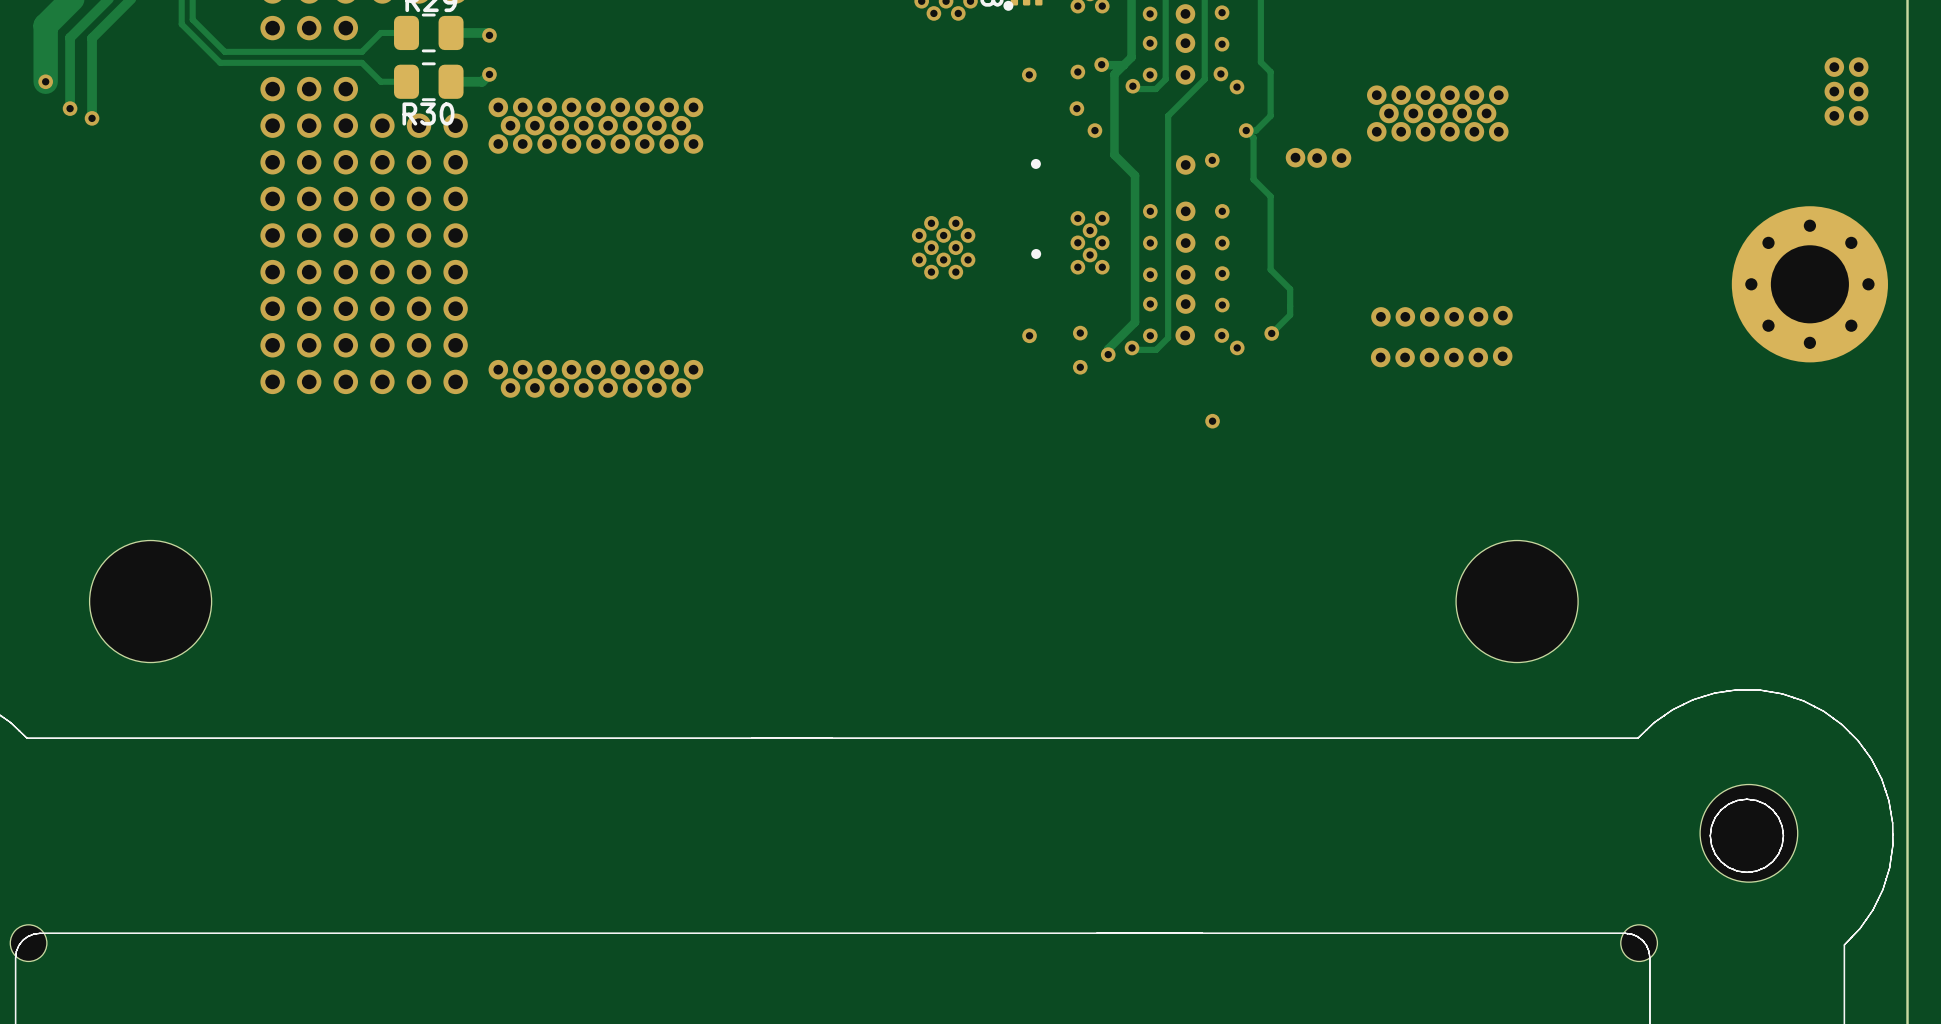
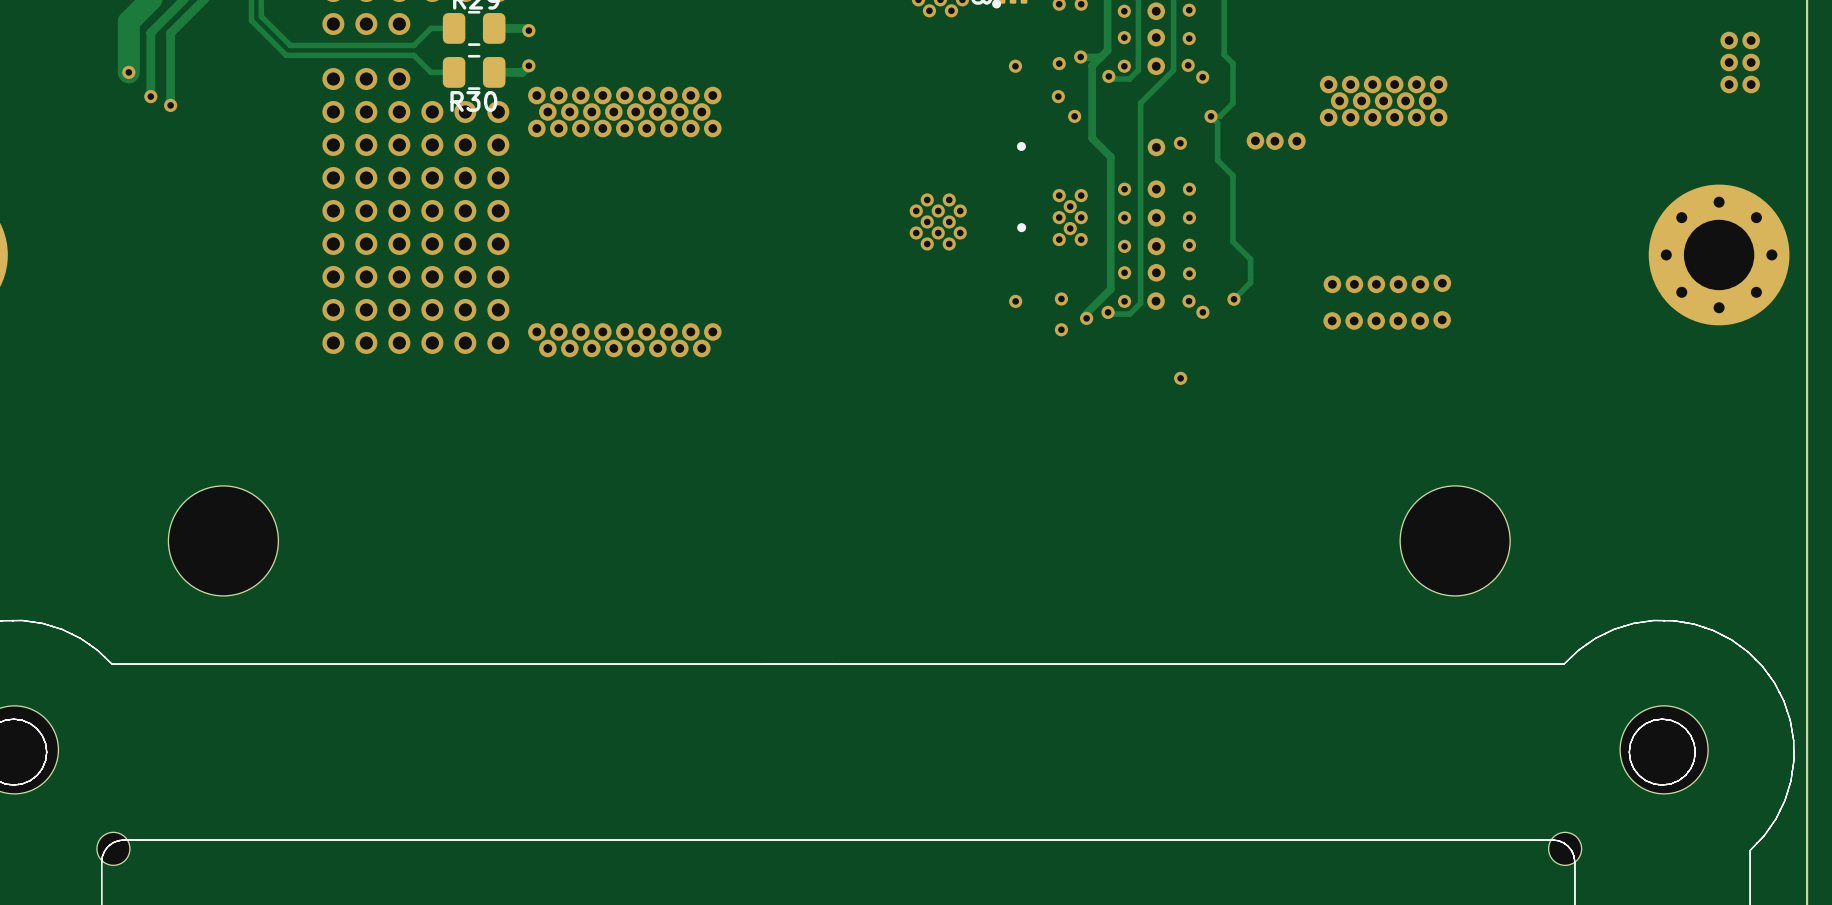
via: none -> (1729, 40)
via: none -> (1751, 40)
via: (1834, 67) -> none
via: (1858, 67) -> none
via: none -> (1729, 62)
via: none -> (1751, 62)
via: (1834, 91) -> none
via: (1858, 91) -> none
via: none -> (1729, 84)
via: none -> (1751, 84)
via: (1834, 115) -> none
via: (1858, 115) -> none

